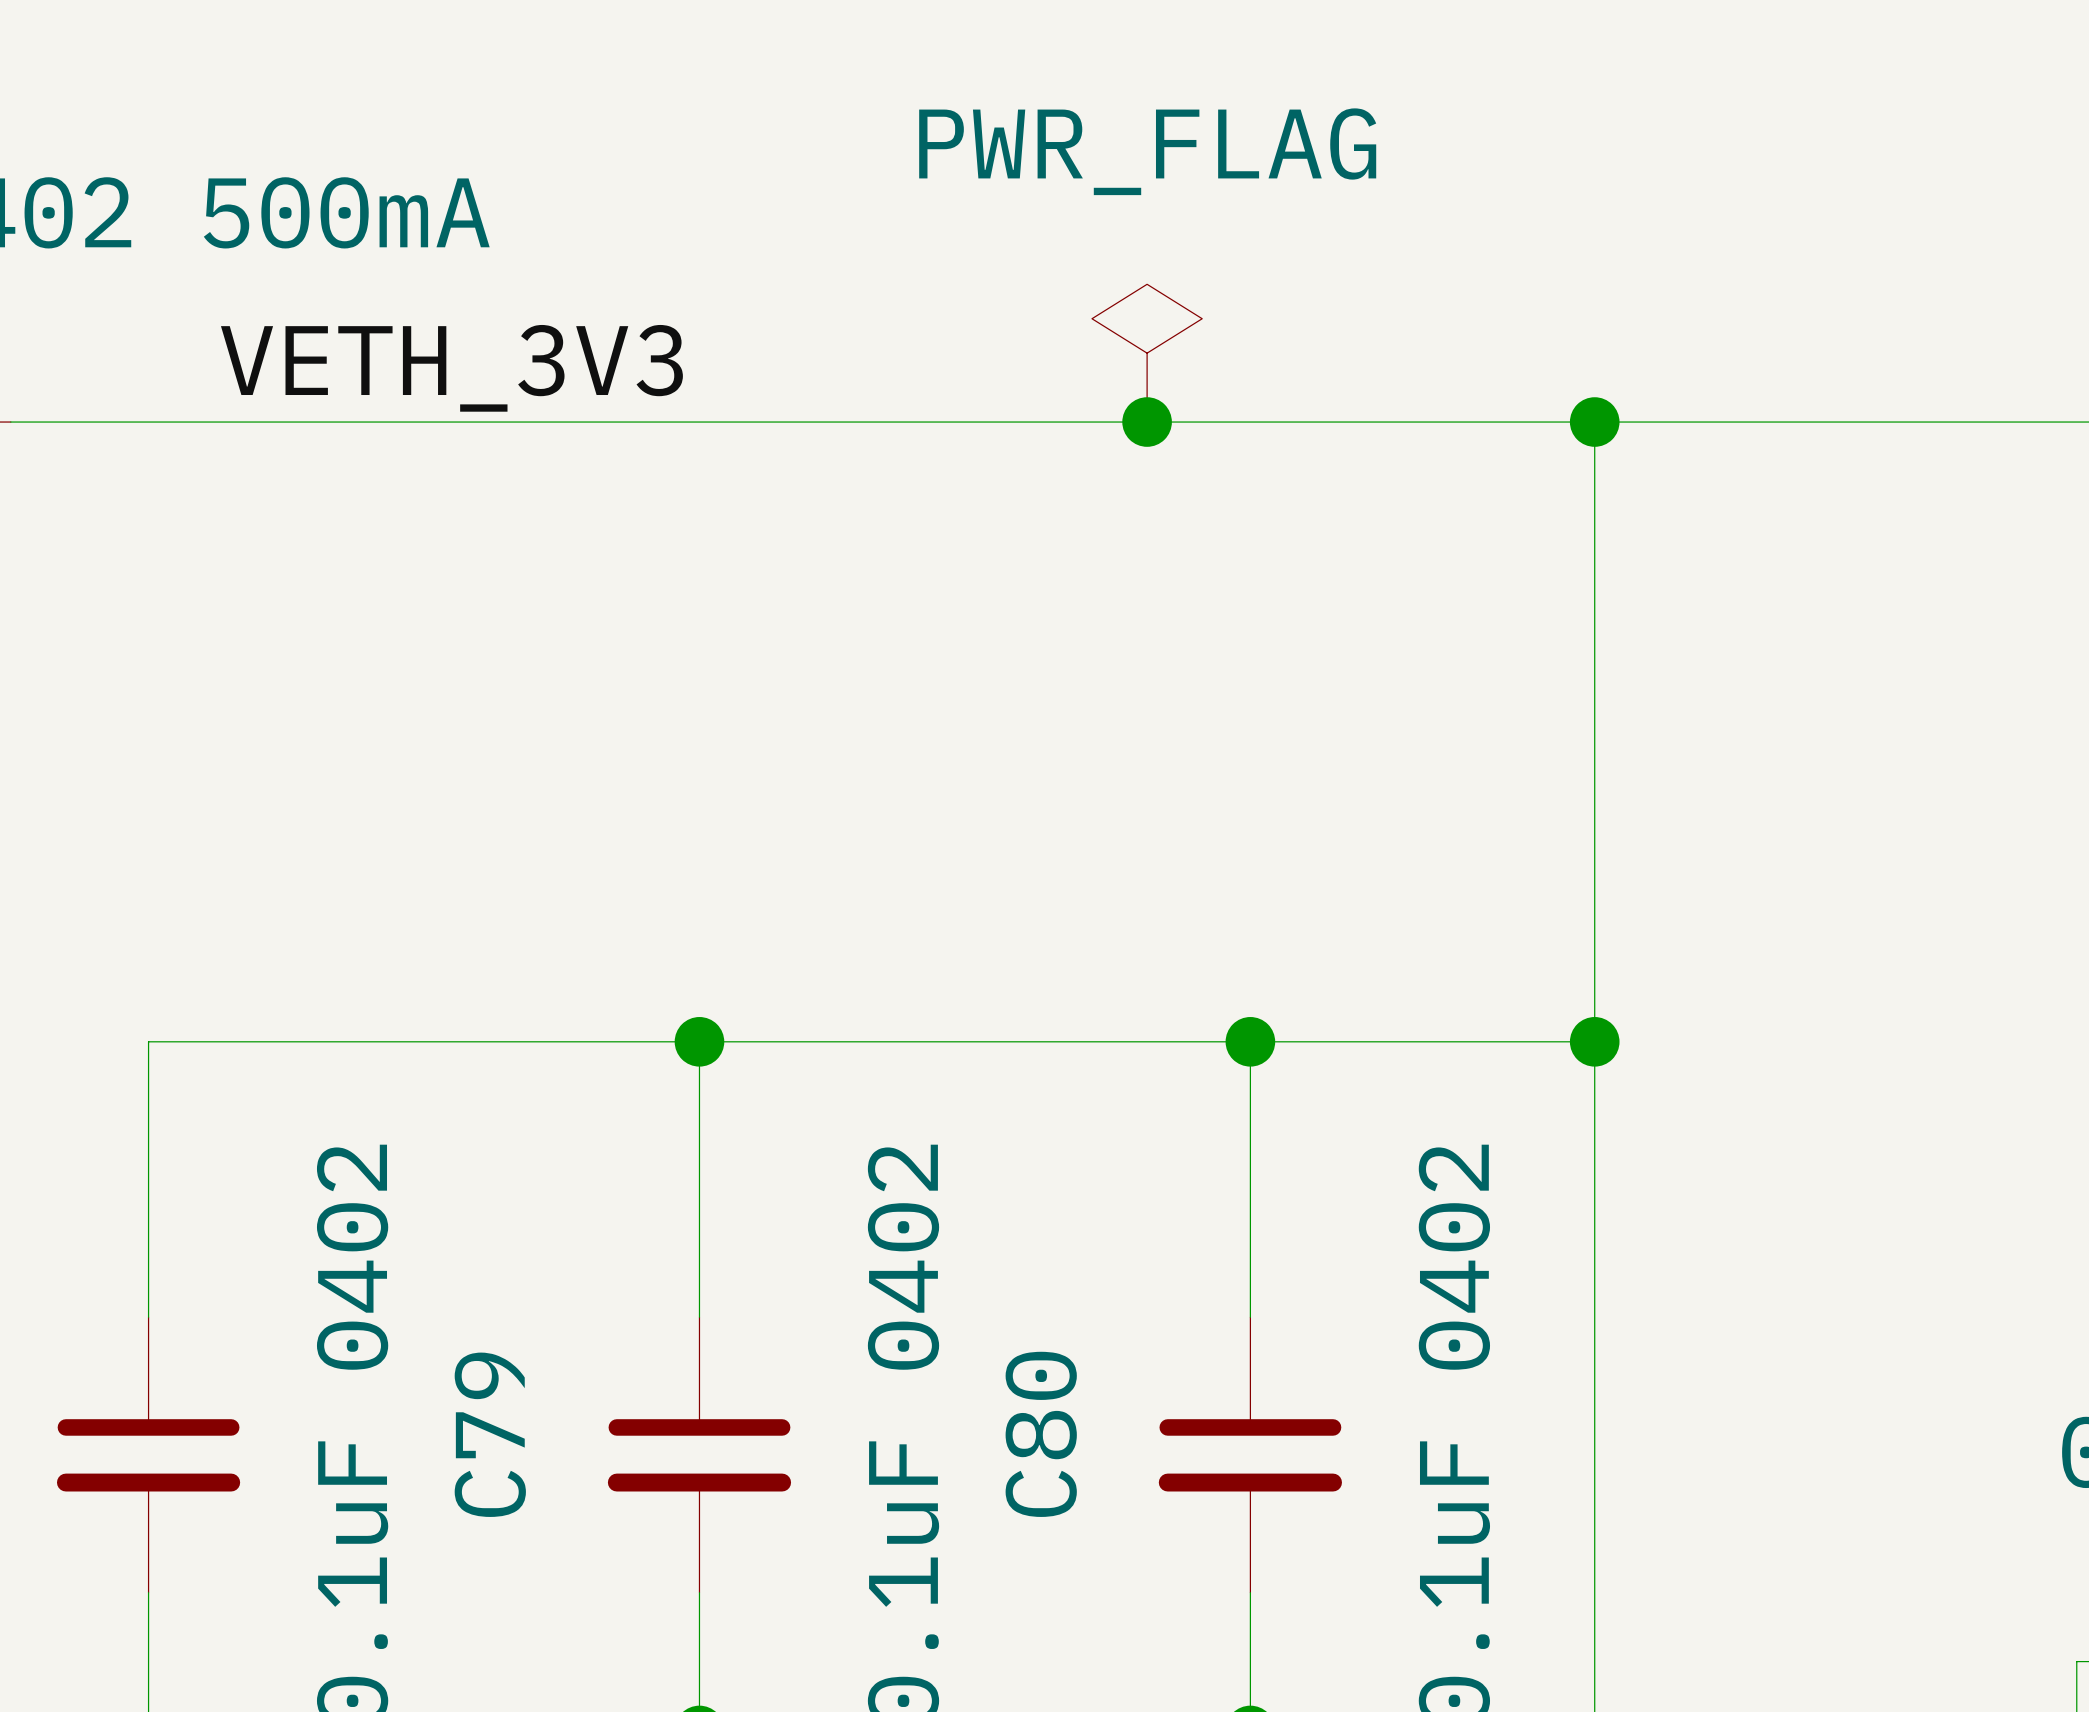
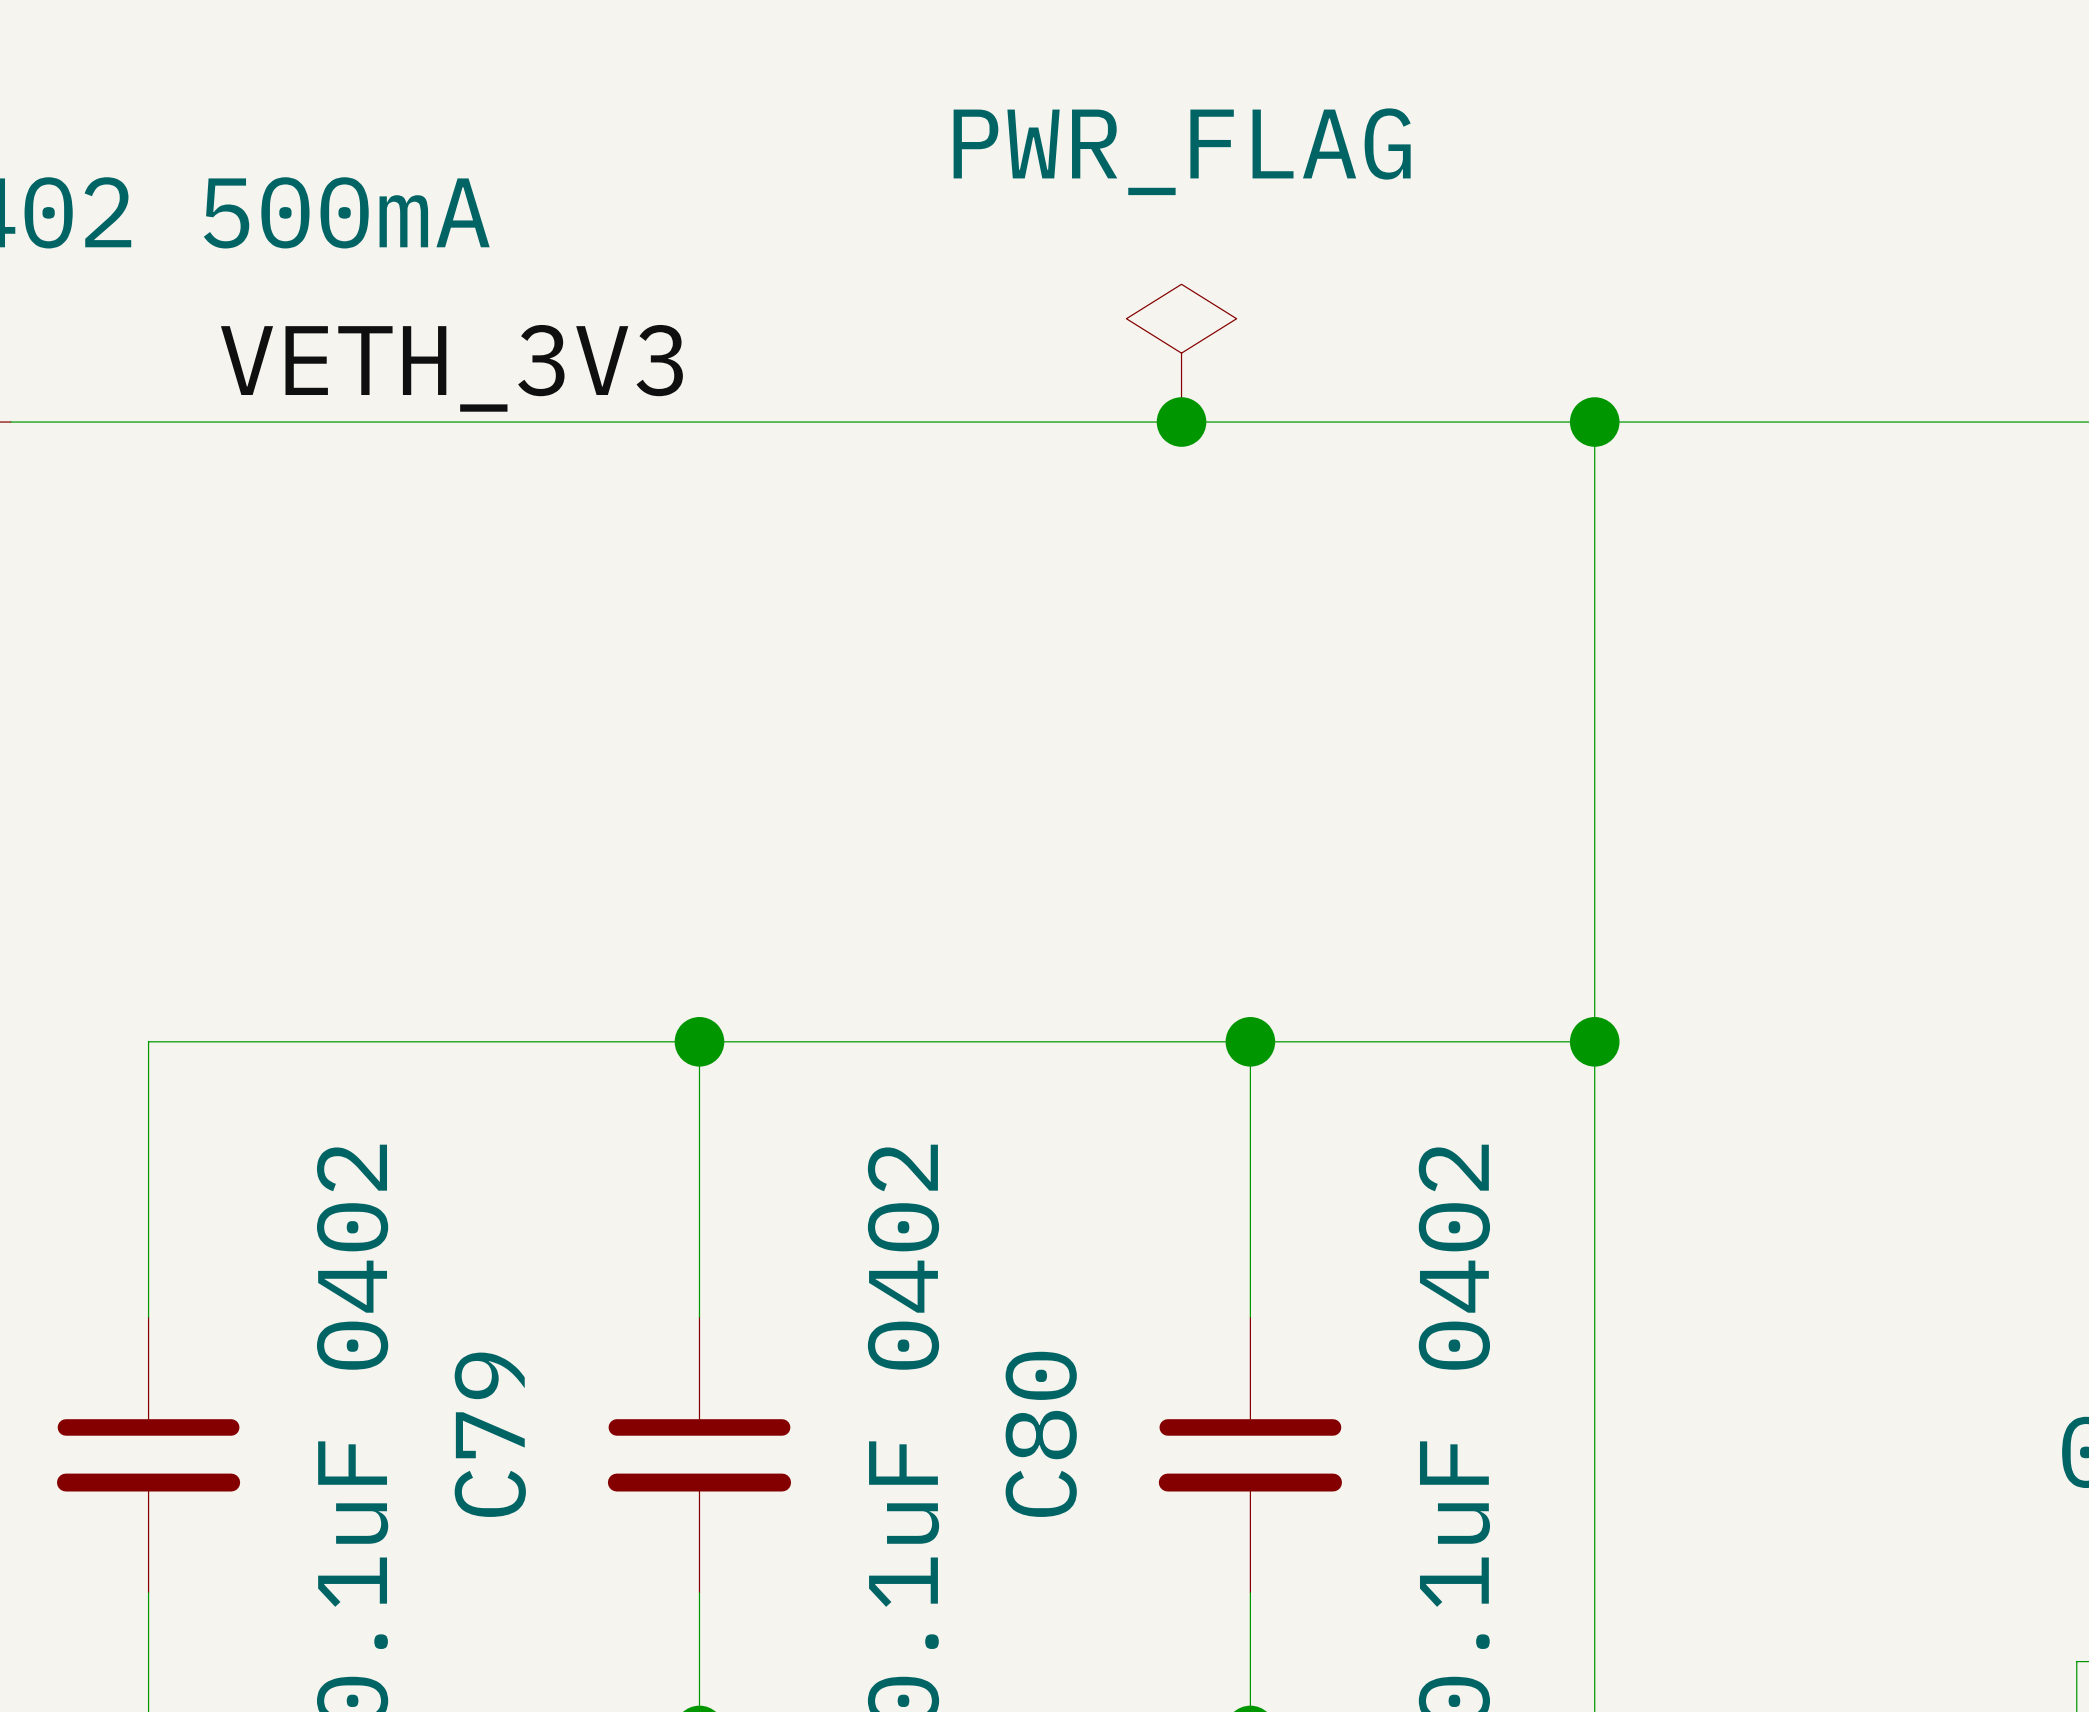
power symbol position: PWR_FLAG (1147, 353) -> PWR_FLAG (1181, 353)
junction position: (1147, 422) -> (1181, 422)

